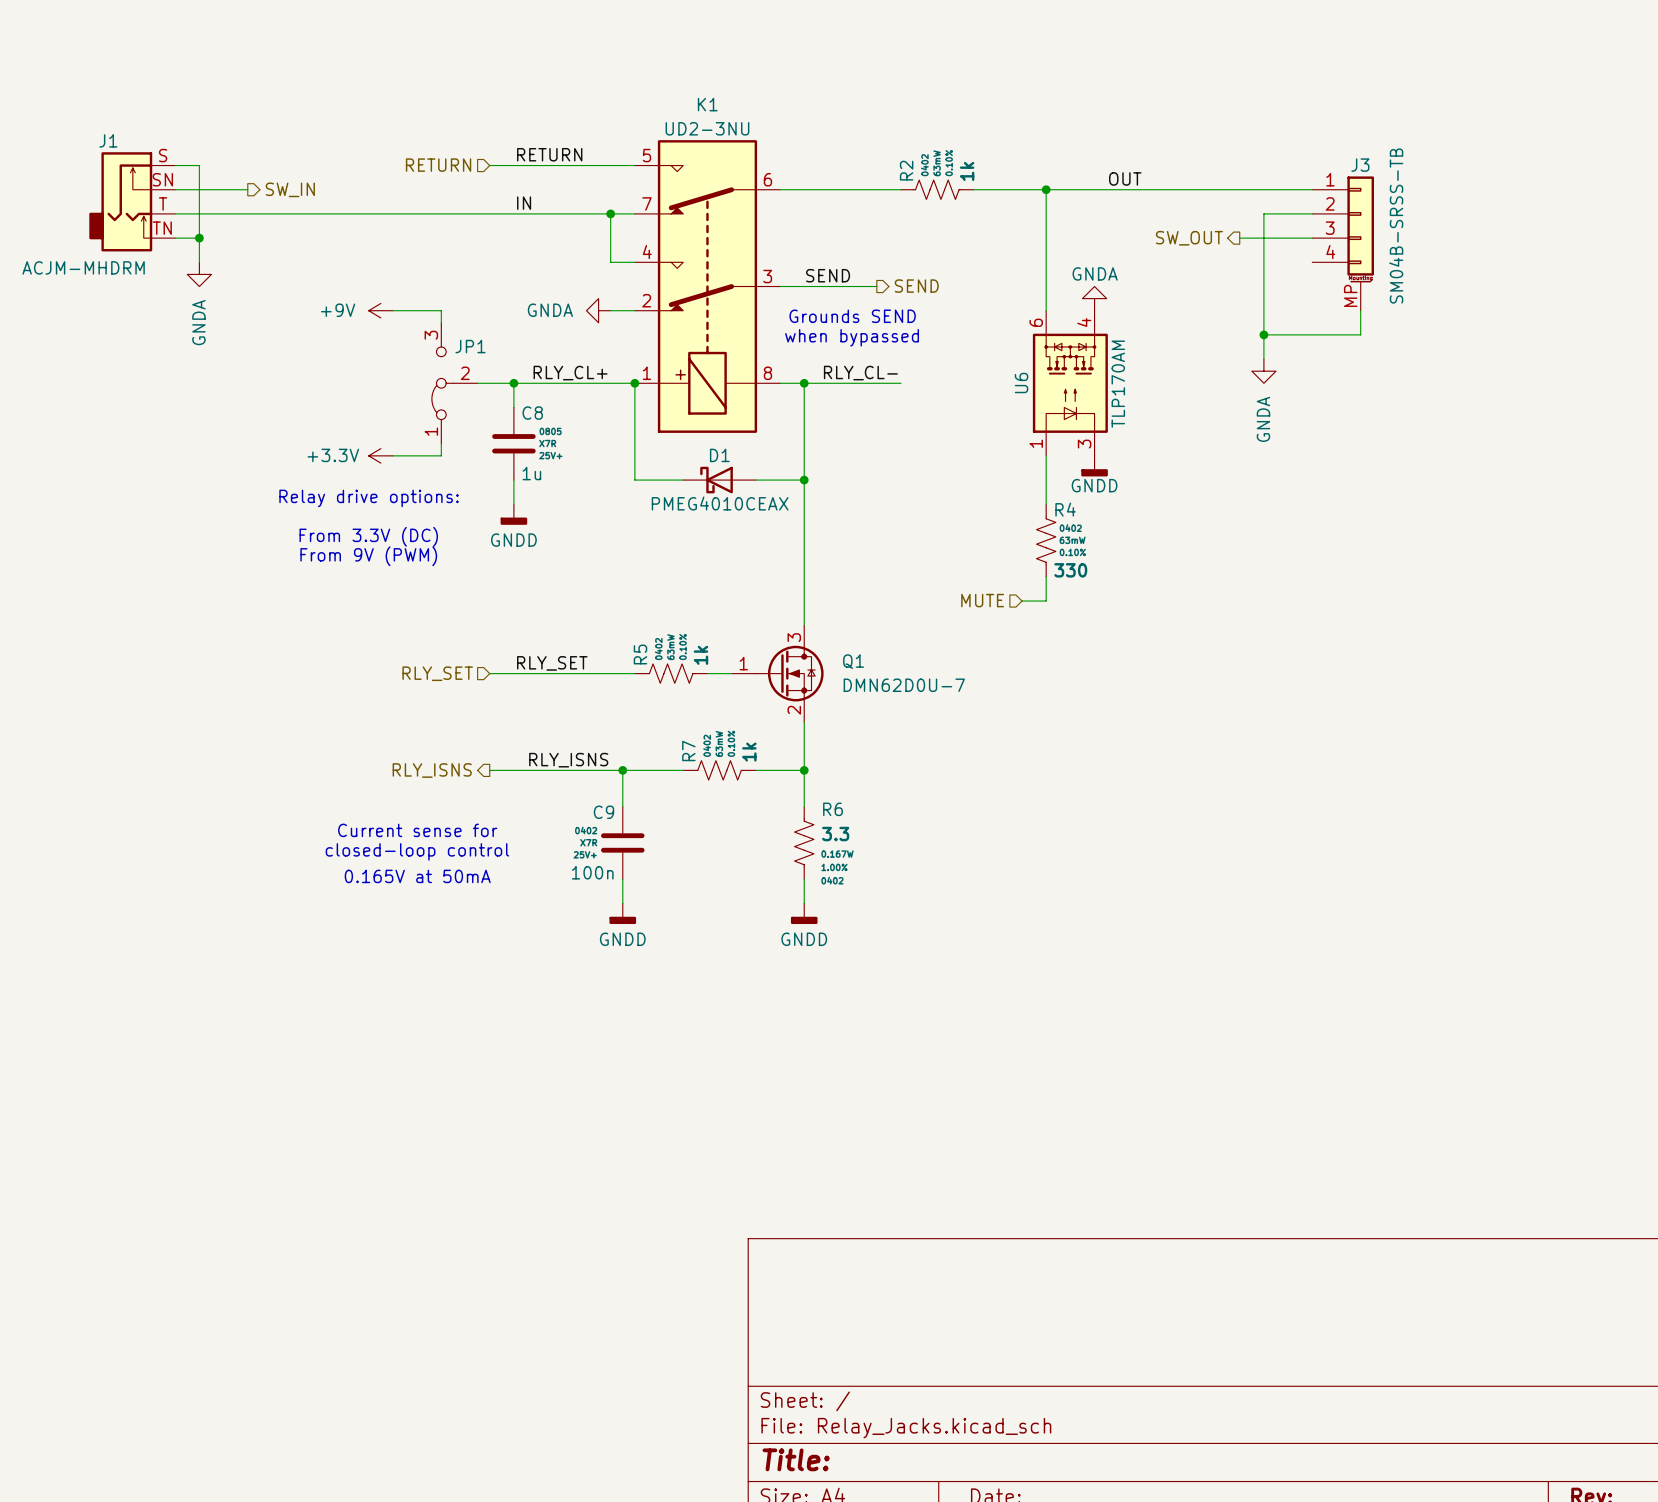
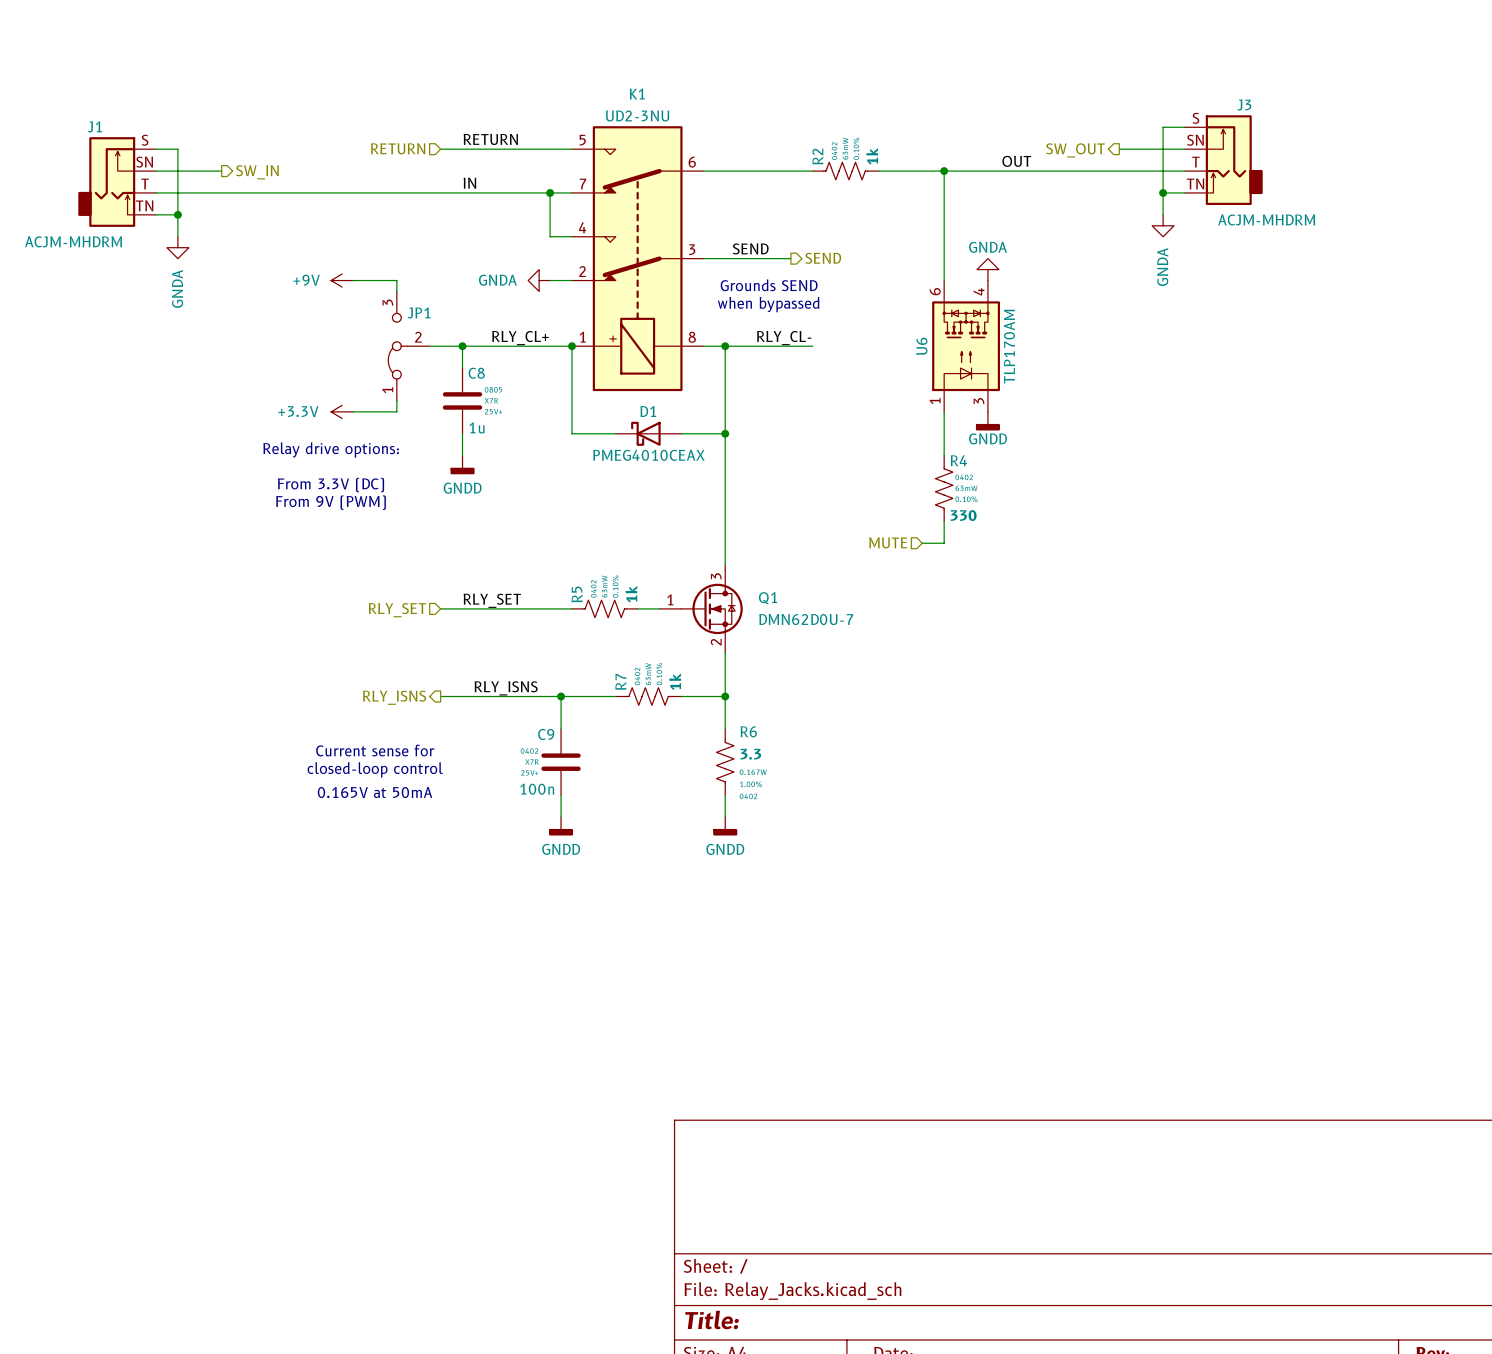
wire: none -> (1184, 127) (1163, 127) (1163, 214)
J3 symbol: [1312, 176, 1375, 311] -> [1184, 115, 1263, 206]
wire: (1288, 213) (1263, 213) (1263, 359) -> none
junction: none -> (1163, 192)
J3 text: SM04B-SRSS-TB (1396, 226) -> ACJM-MHDRM (1266, 219)
hierarchical label position: SW_OUT (1189, 238) -> SW_OUT (1075, 150)
wire: (1239, 238) (1312, 238) -> (1119, 149) (1184, 149)
wire: (1360, 310) (1360, 334) (1263, 334) -> none
junction: (1263, 334) -> none
power symbol position: GNDA (1263, 371) -> GNDA (1163, 225)

